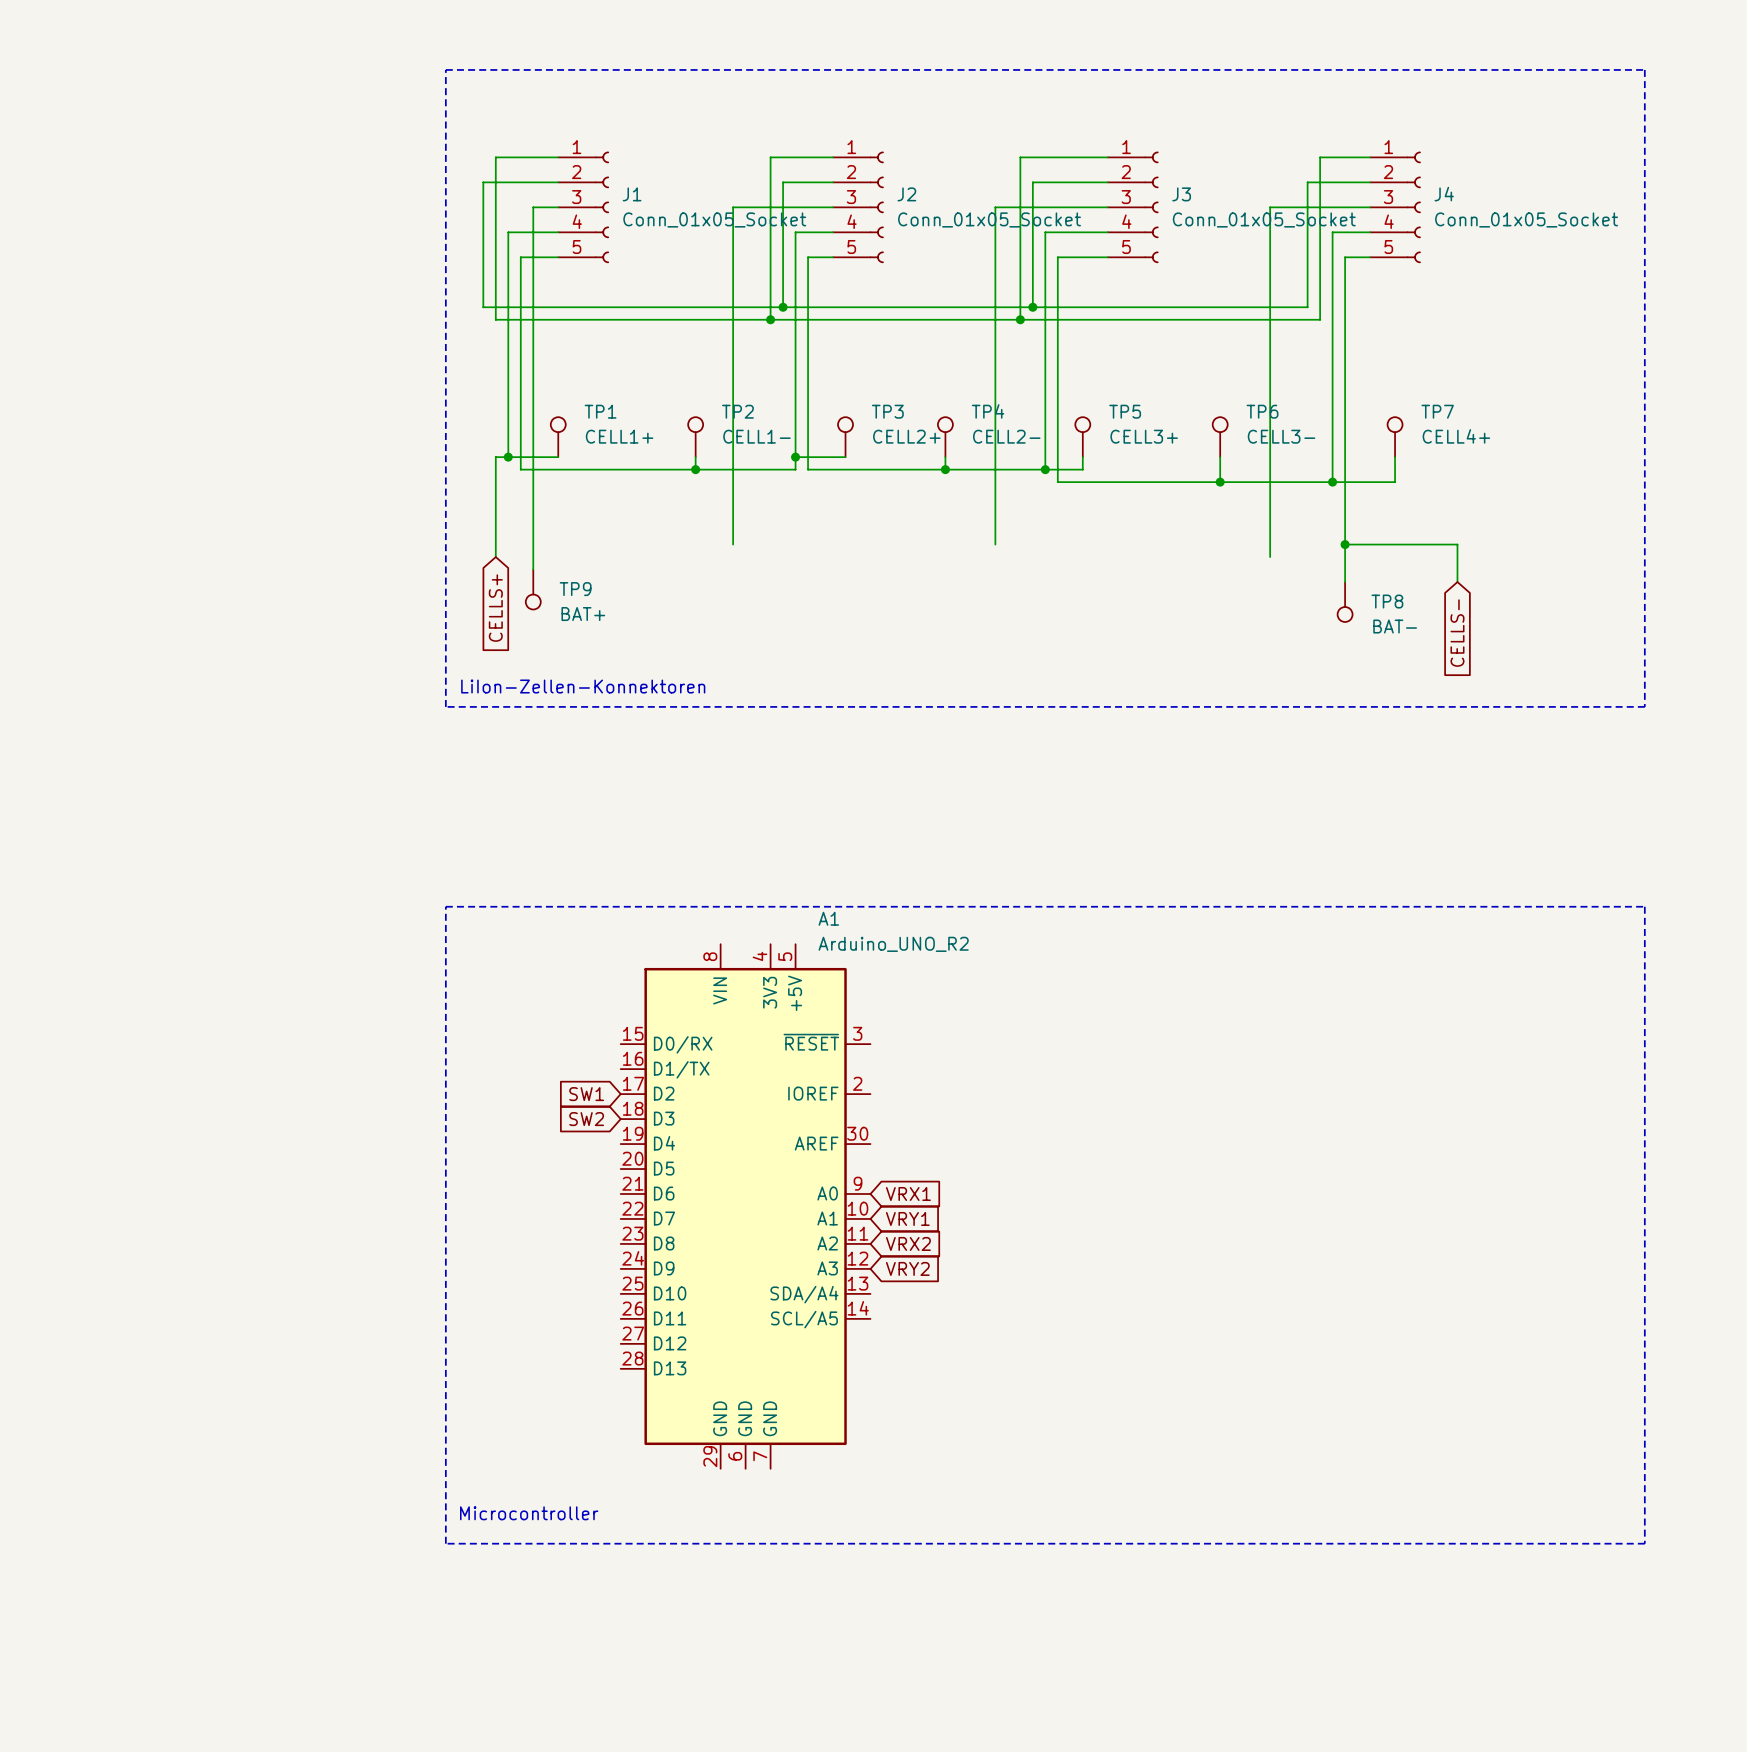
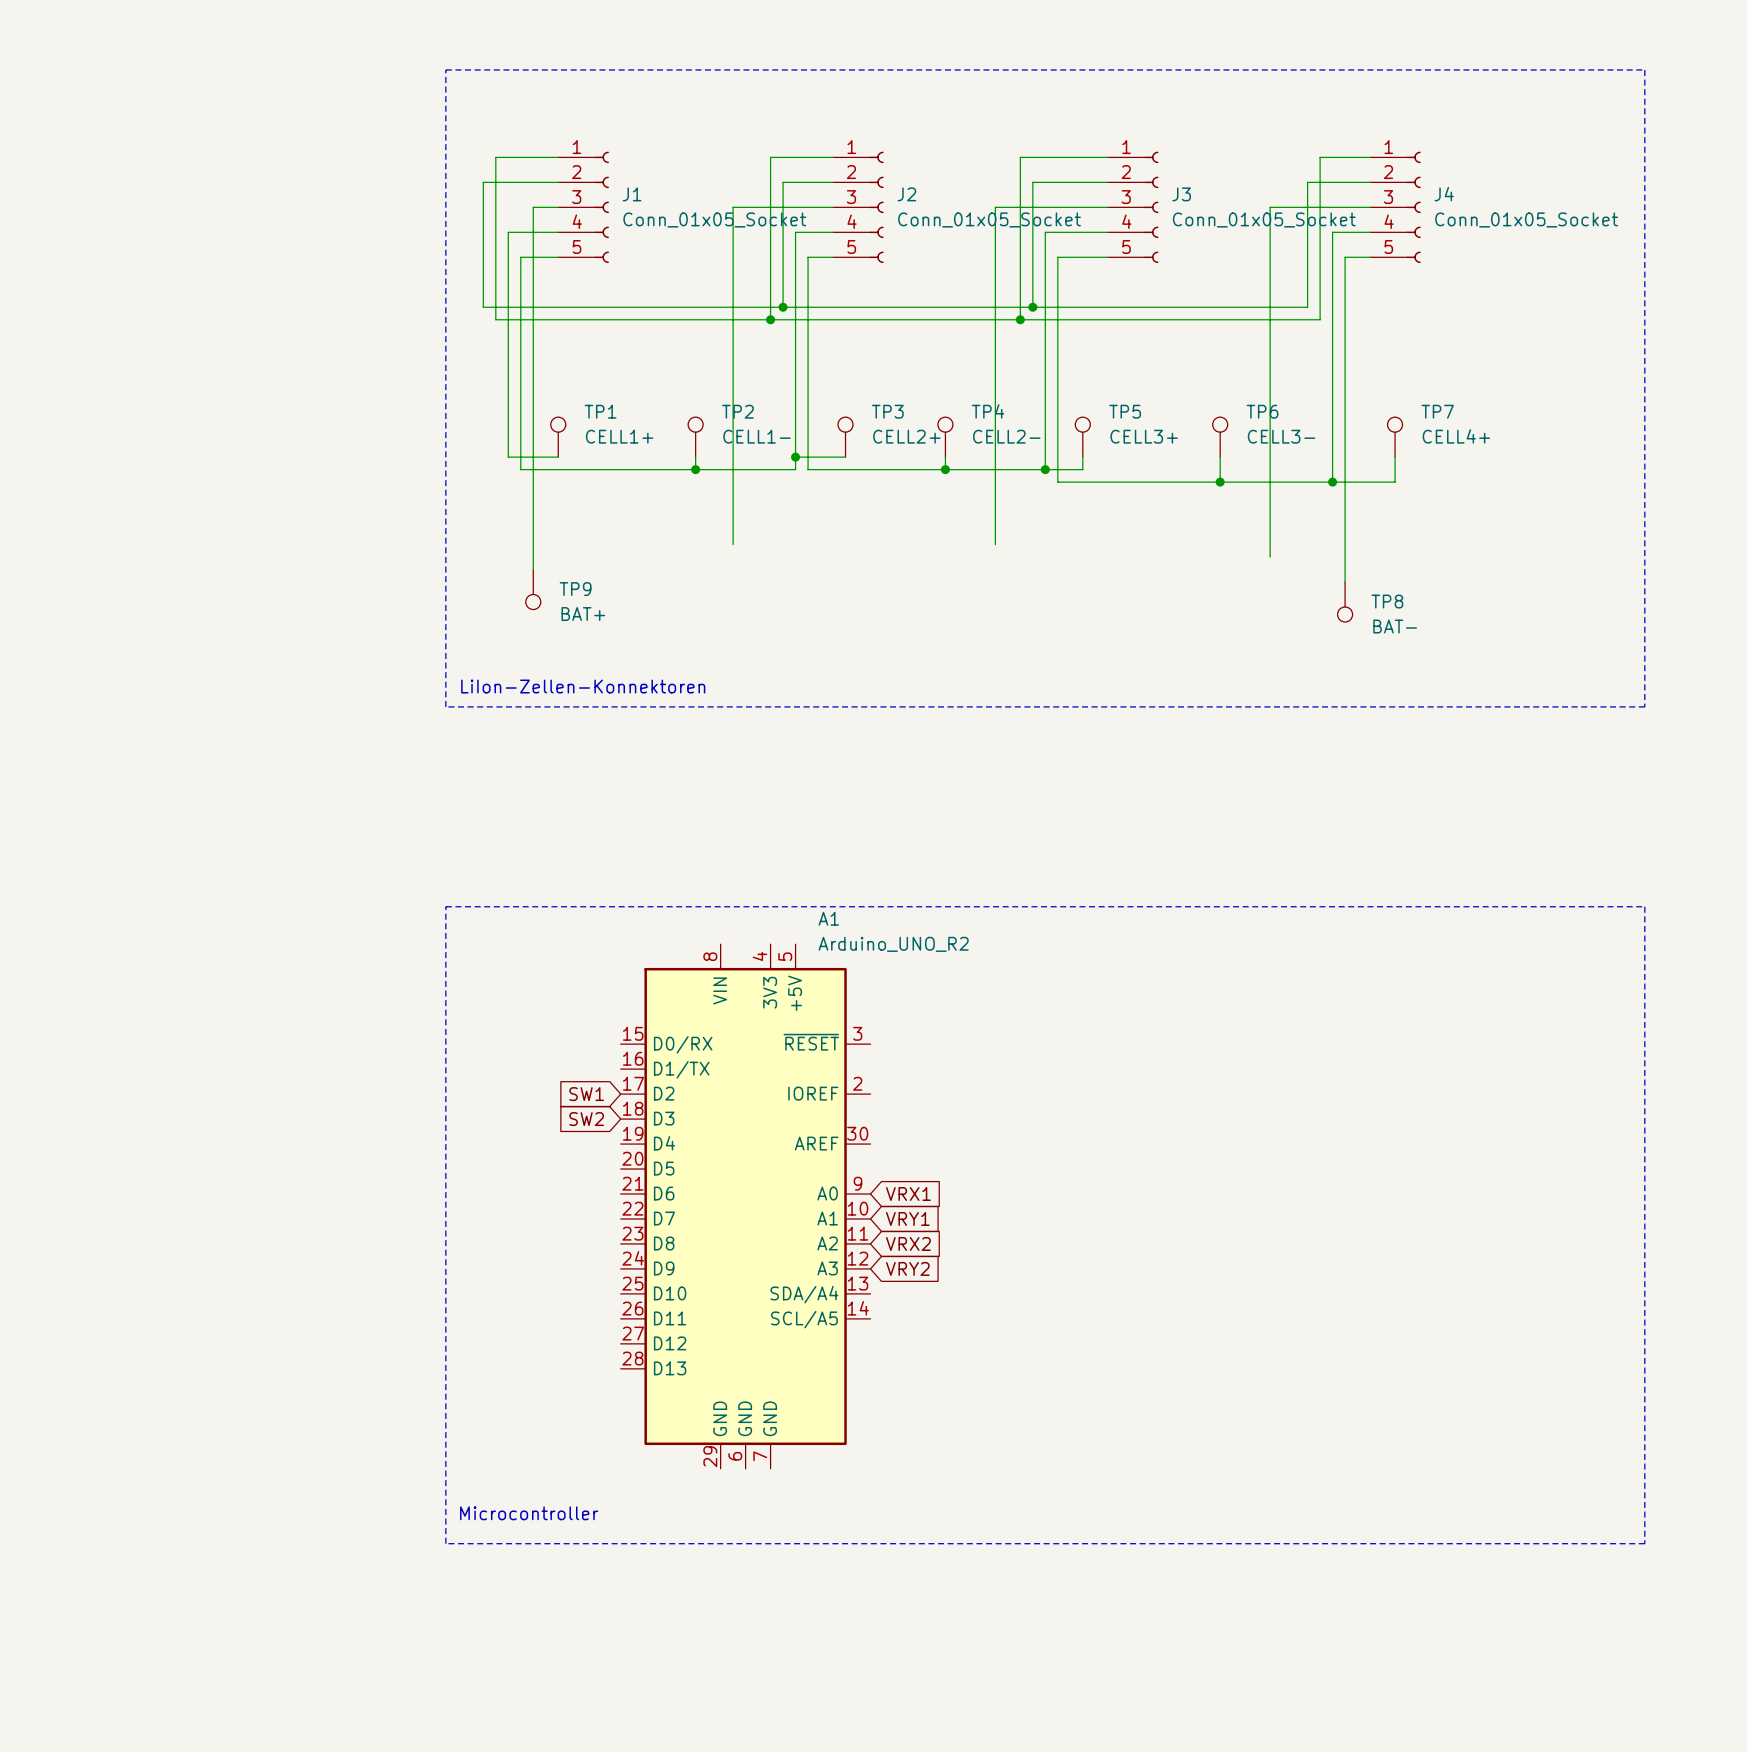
wire: (508, 457) (495, 457) (495, 557) -> none
junction: (508, 457) -> none
wire: (1345, 544) (1457, 544) (1457, 582) -> none
junction: (1345, 544) -> none
global label: CELLS+ (495, 608) -> none
global label: CELLS- (1457, 633) -> none

